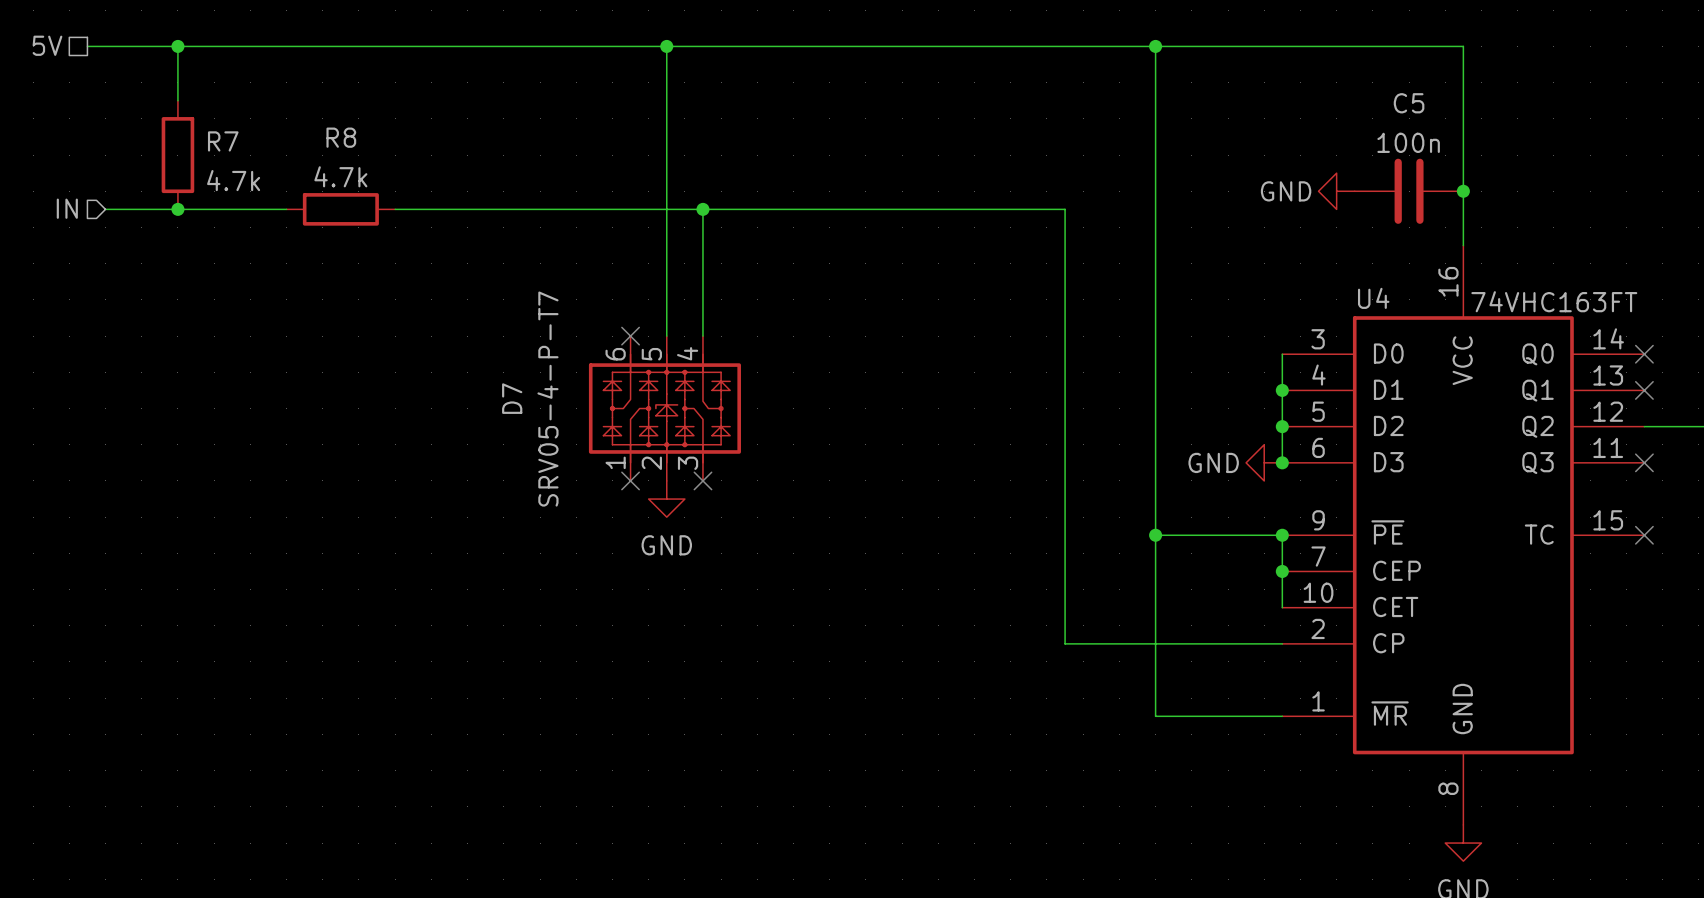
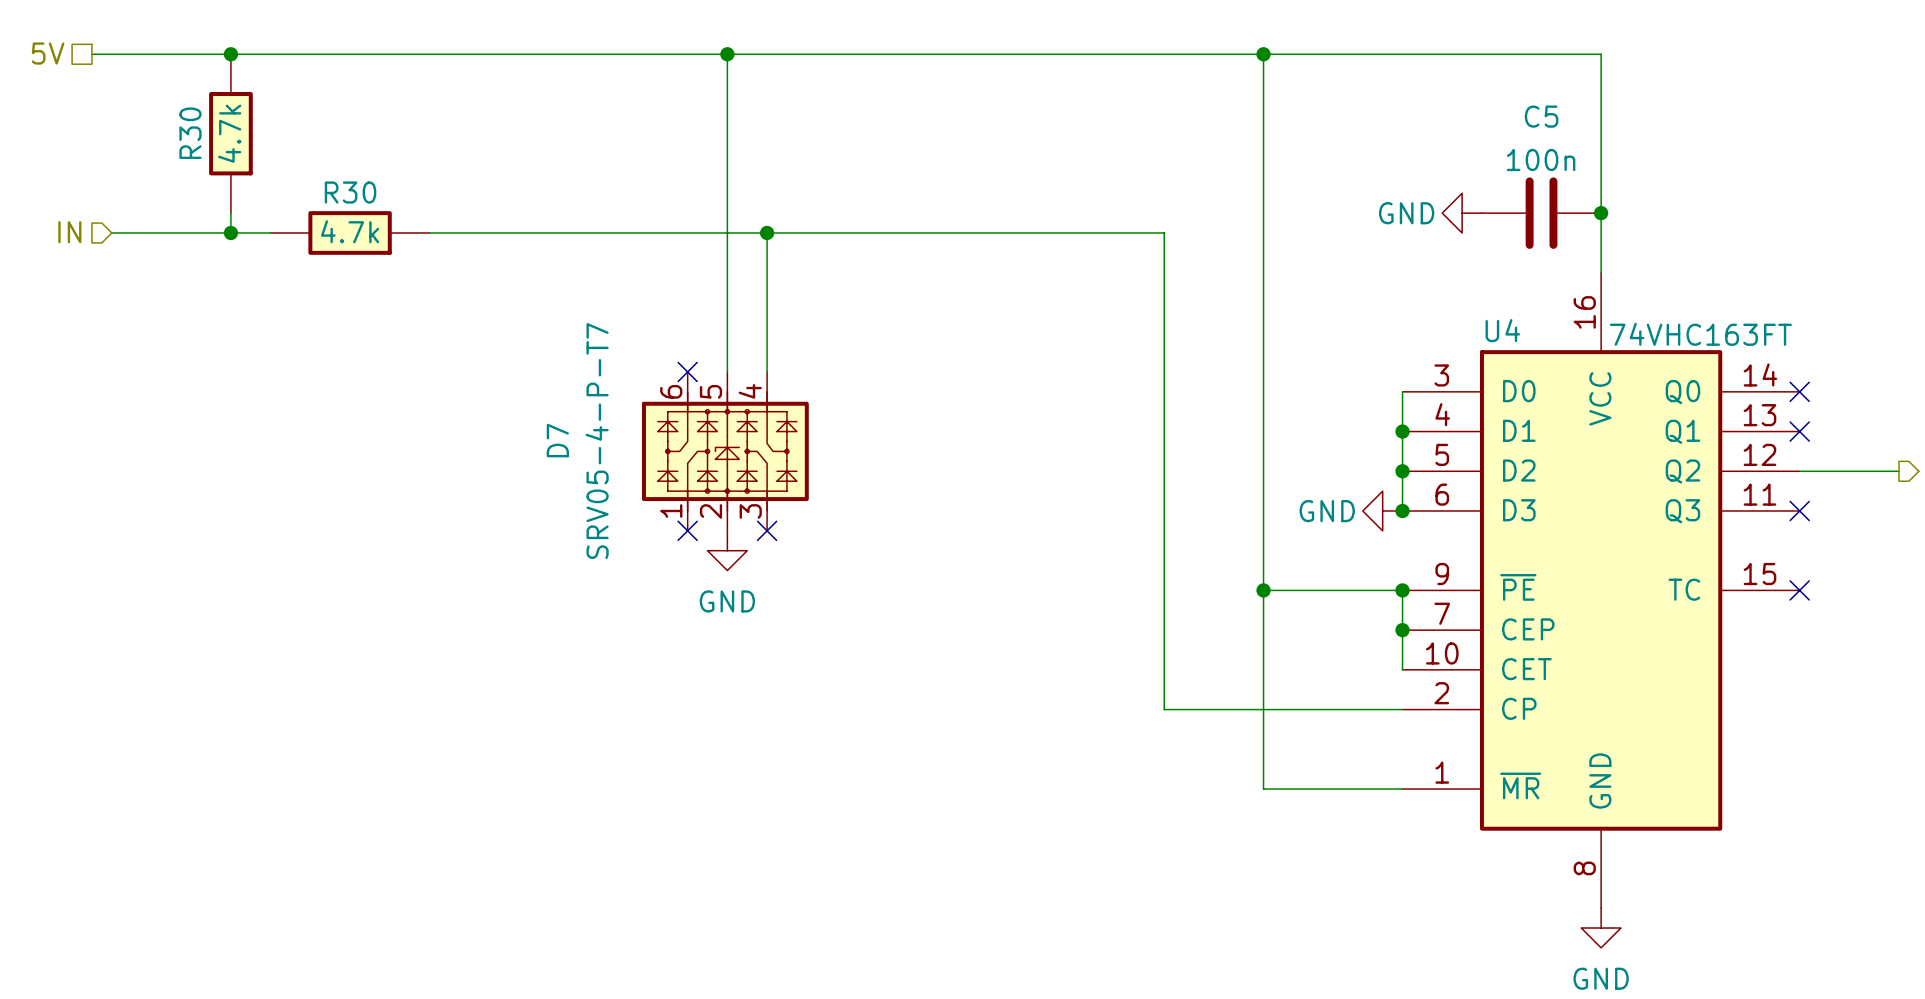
wire: (177, 46) (177, 100) -> none
junction position: (177, 46) -> (230, 54)
R30: none -> 4.7k (230, 133)
R7: 4.7k (177, 155) -> none
wire: none -> (230, 213) (230, 232)
junction position: (177, 209) -> (230, 232)
R30: none -> 4.7k (350, 232)
R8: 4.7k (340, 209) -> none

